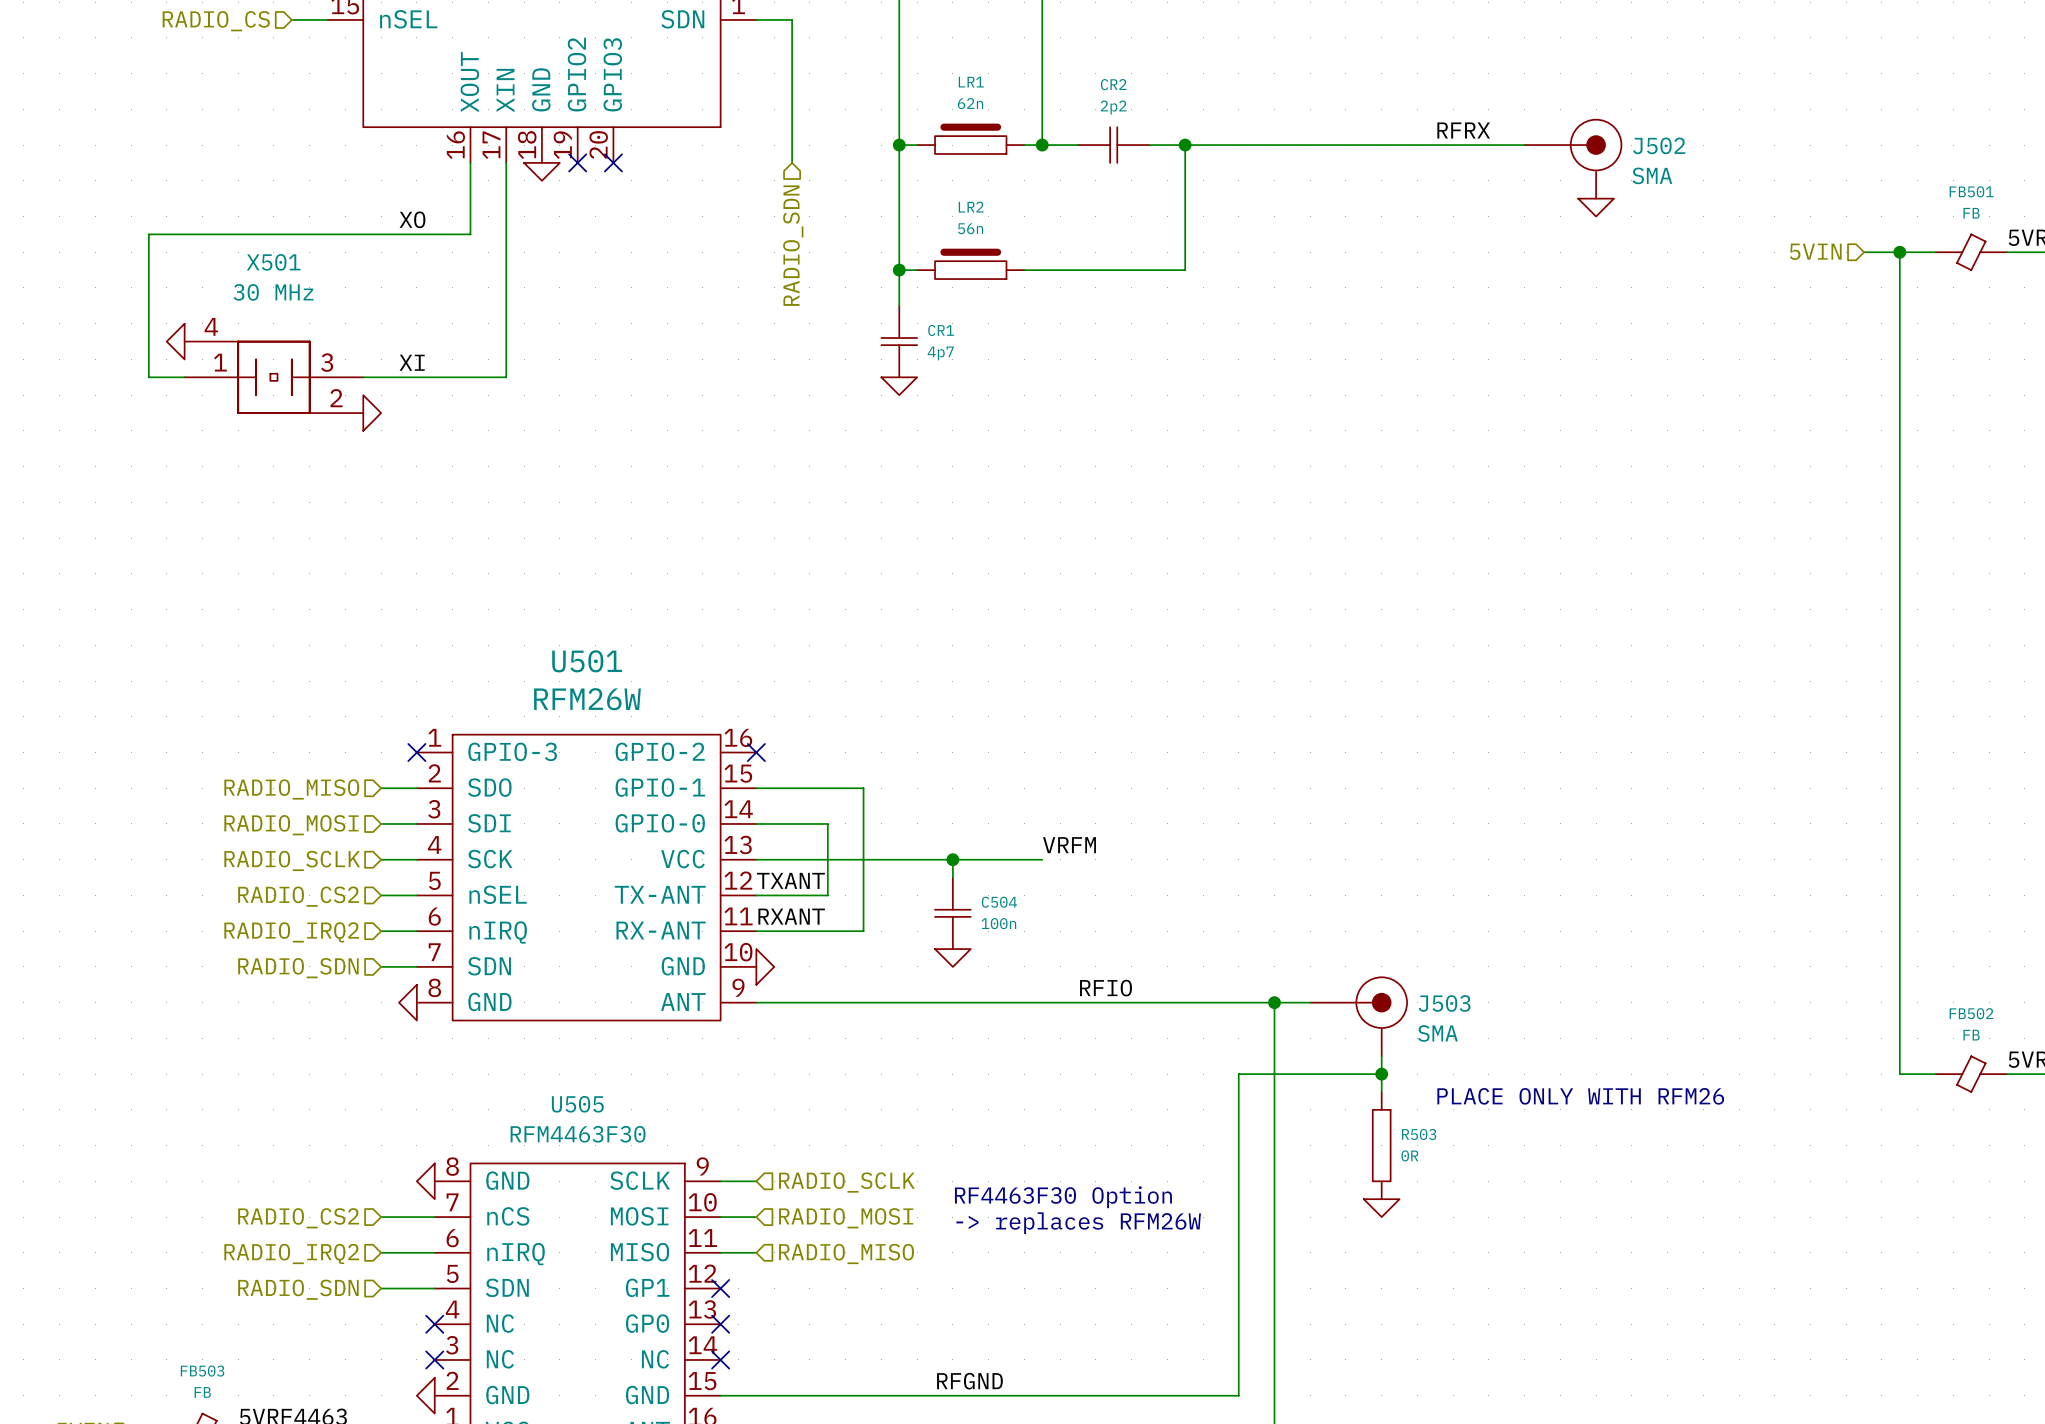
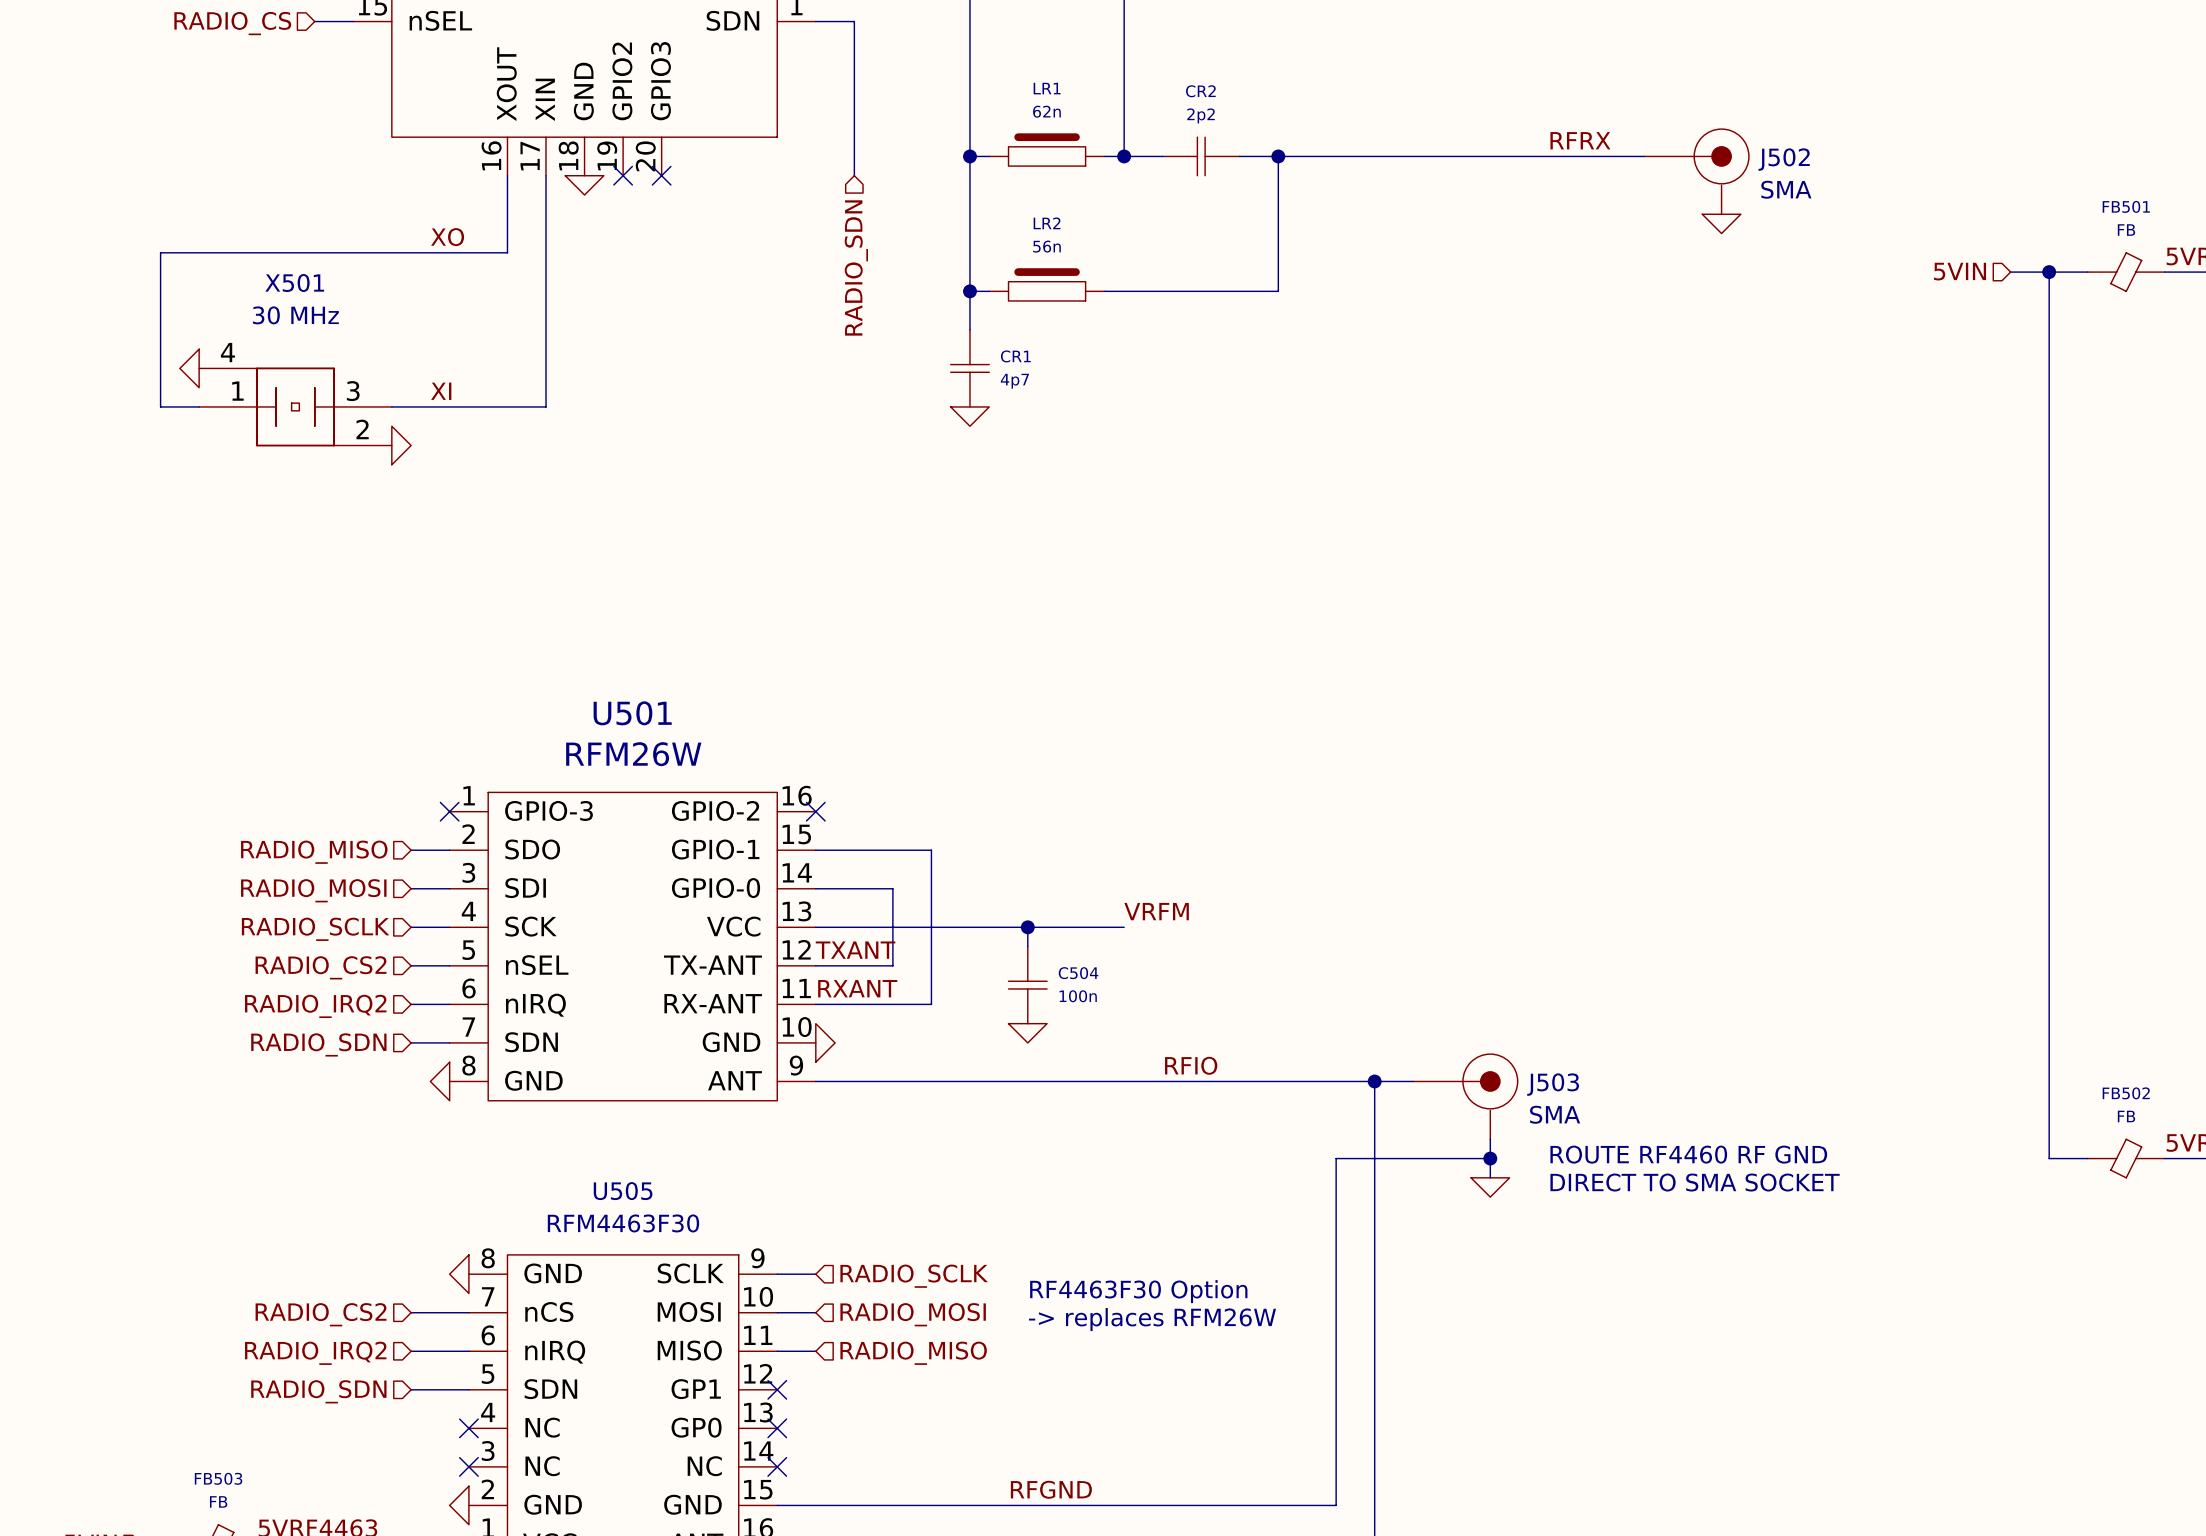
text: none -> ROUTE RF4460 RF GND (1688, 1154)
text: PLACE ONLY WITH RFM26 (1580, 1096) -> DIRECT TO SMA SOCKET (1695, 1182)
R503: 0R (1381, 1145) -> none
power symbol position: (1381, 1208) -> (1490, 1187)

